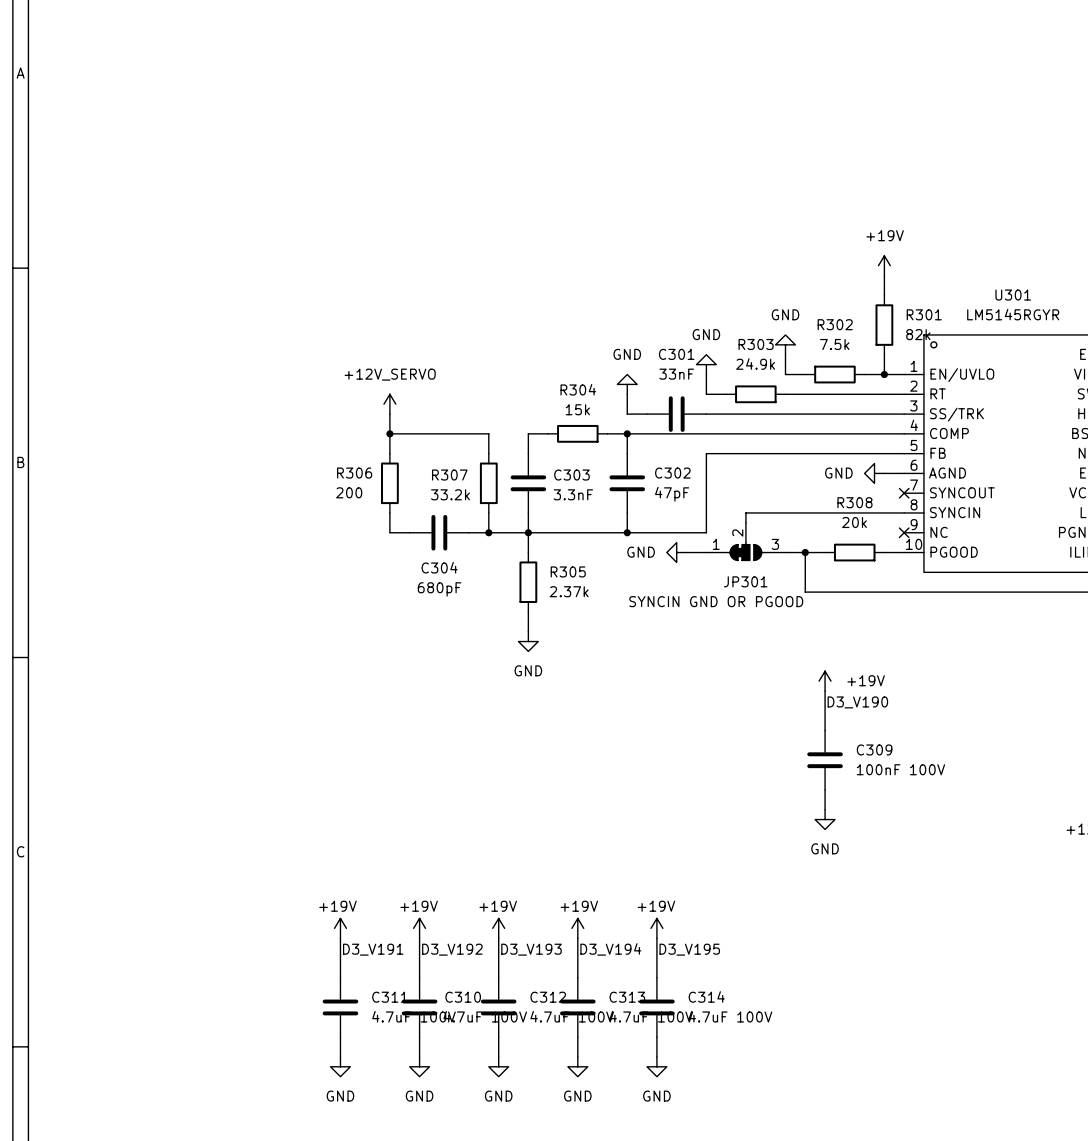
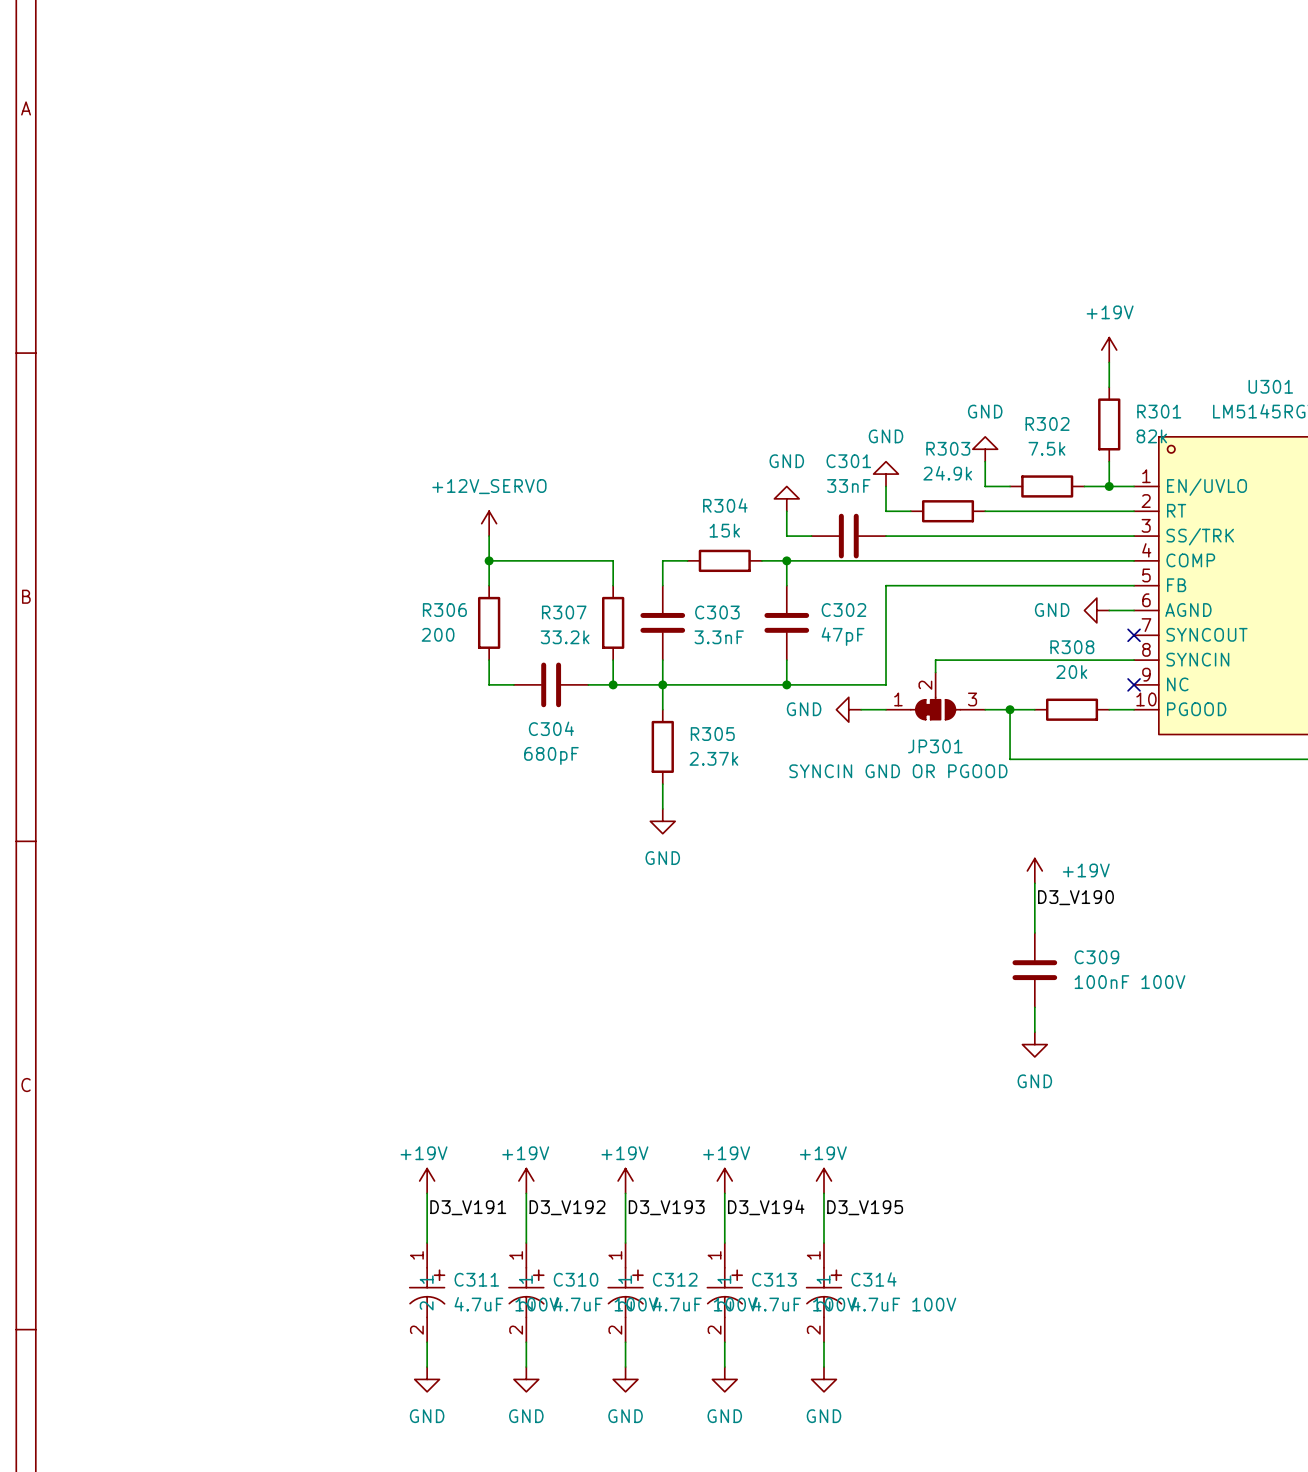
C311 symbol: [322, 977, 359, 1038] -> [409, 1243, 445, 1343]
C310 symbol: [401, 977, 438, 1038] -> [508, 1243, 544, 1343]
C312 symbol: [480, 977, 517, 1038] -> [608, 1243, 644, 1343]
C313 symbol: [560, 977, 596, 1038] -> [707, 1243, 743, 1343]
C314 symbol: [639, 977, 675, 1038] -> [806, 1243, 842, 1343]
power symbol position: GND (340, 1066) -> GND (427, 1379)
power symbol position: GND (419, 1066) -> GND (526, 1379)
power symbol position: GND (498, 1066) -> GND (625, 1379)
power symbol position: GND (577, 1066) -> GND (724, 1379)
power symbol position: GND (656, 1066) -> GND (823, 1379)

